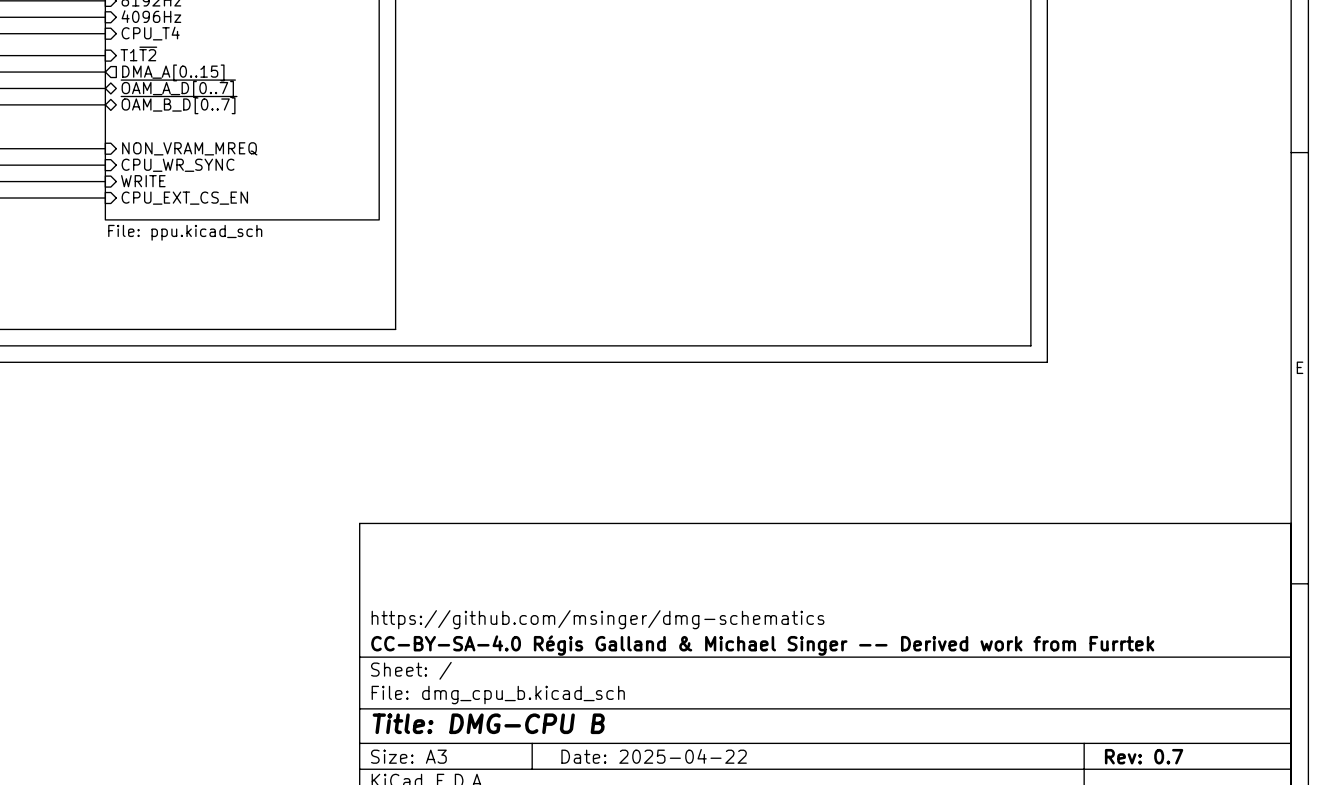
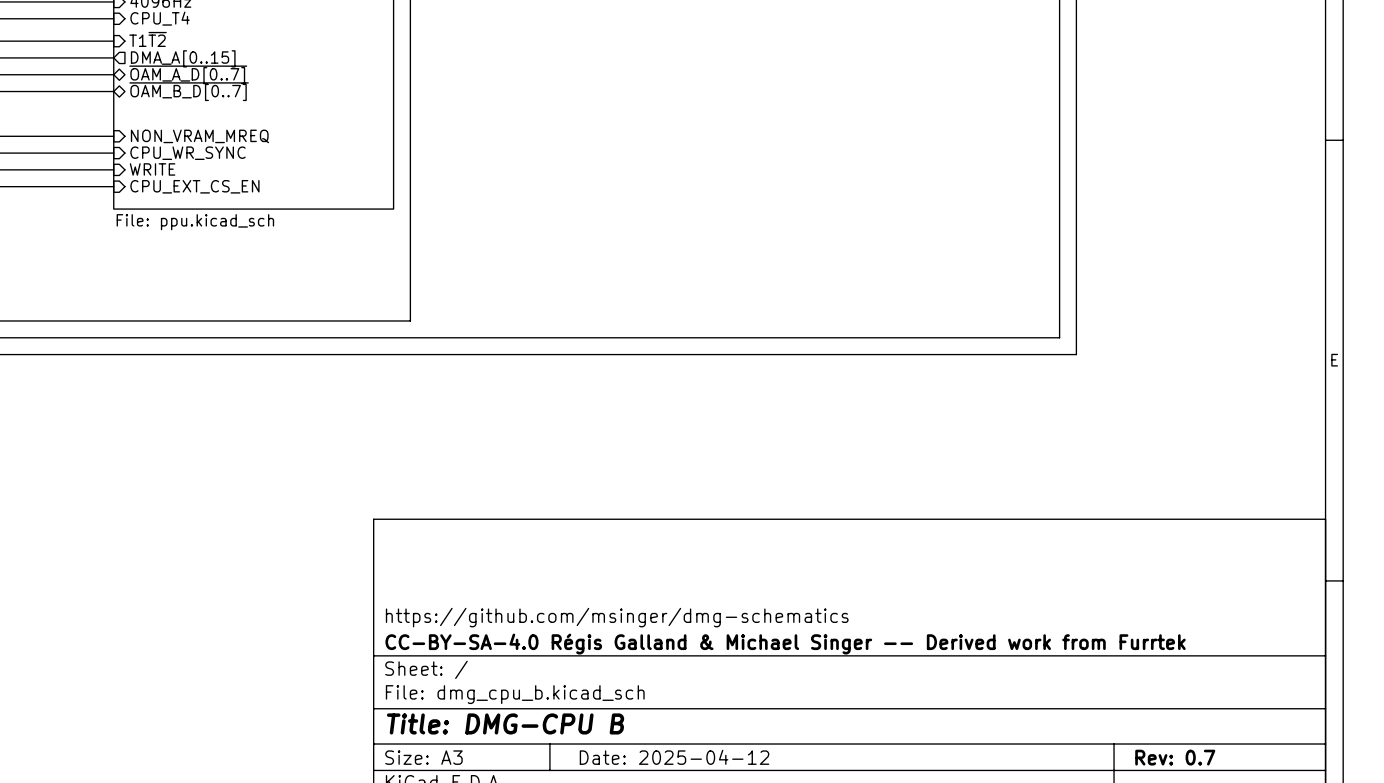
title block: Date: 2025-04-22 (654, 756) -> Date: 2025-04-12 (674, 757)

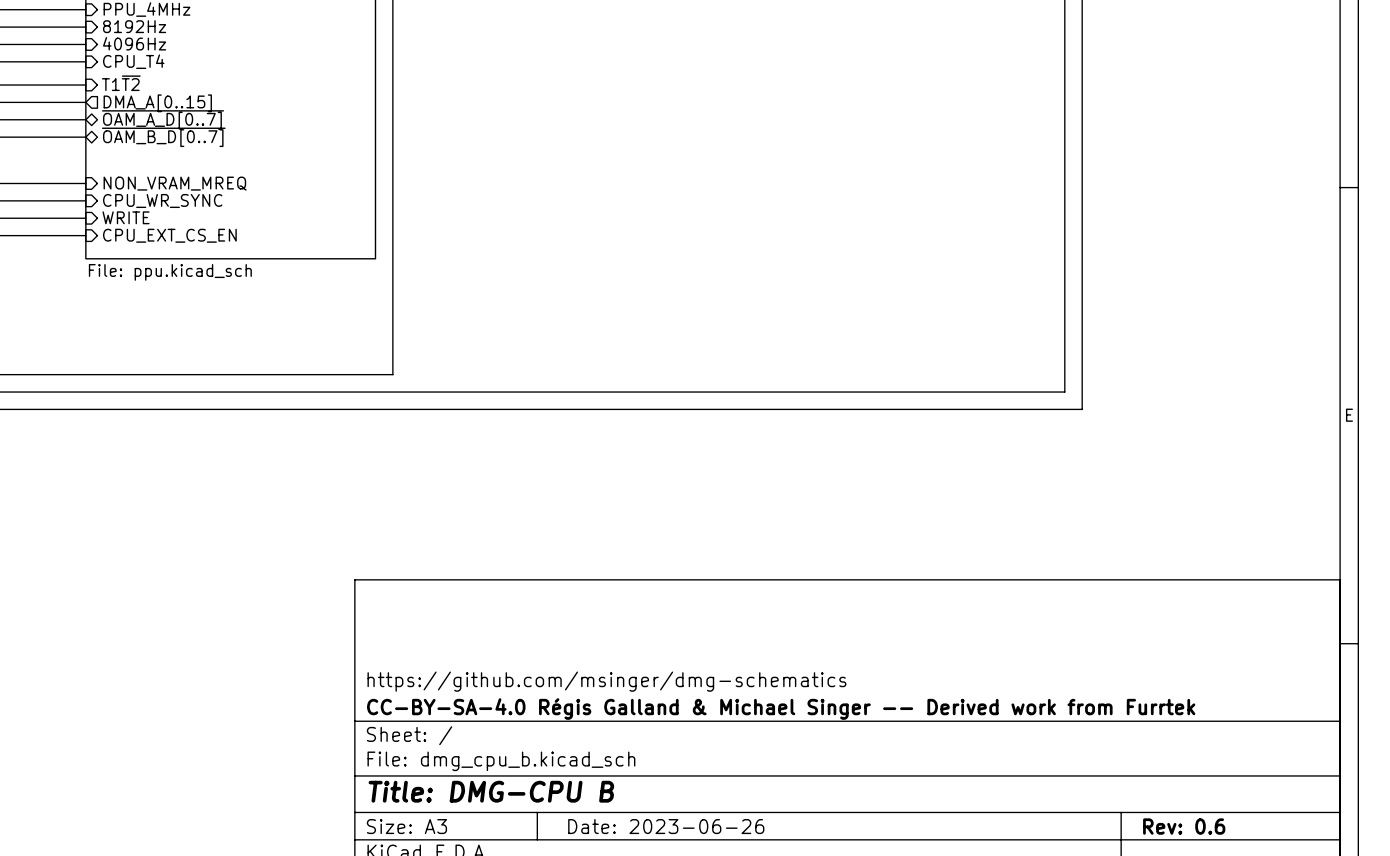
title block: Date: 2025-04-12 (674, 757) -> Date: 2023-06-26 (666, 826)
title block: Rev: 0.7 (1175, 757) -> Rev: 0.6 (1184, 826)

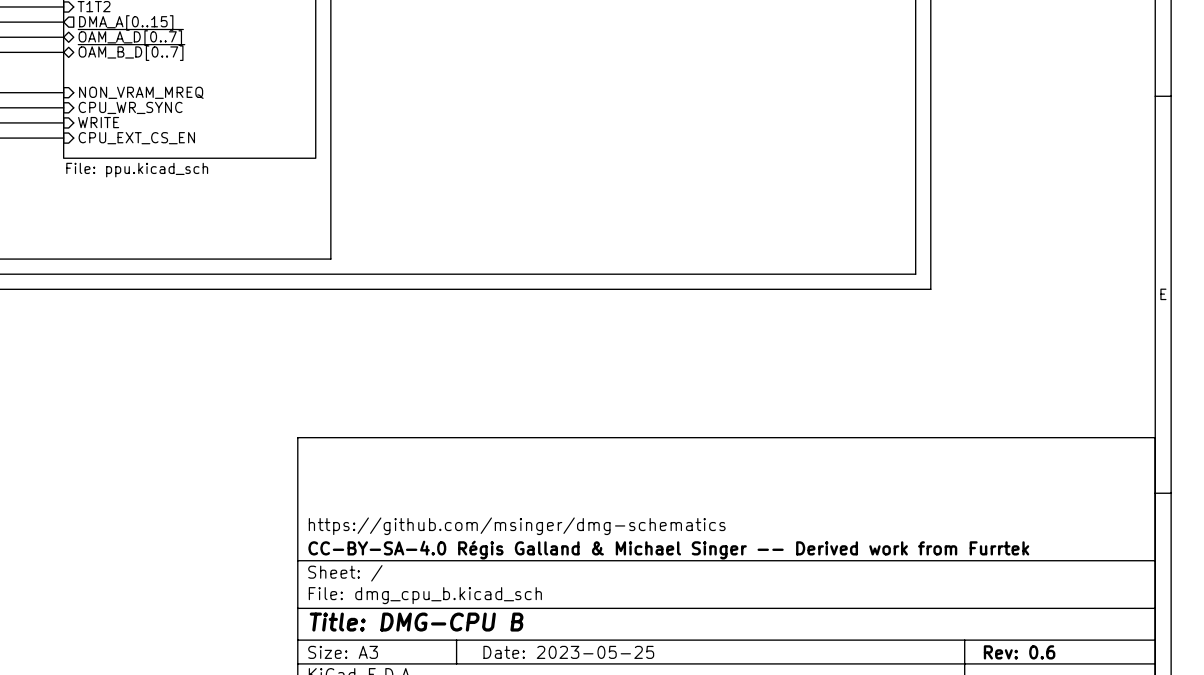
title block: Date: 2023-06-26 (666, 826) -> Date: 2023-05-25 (568, 652)

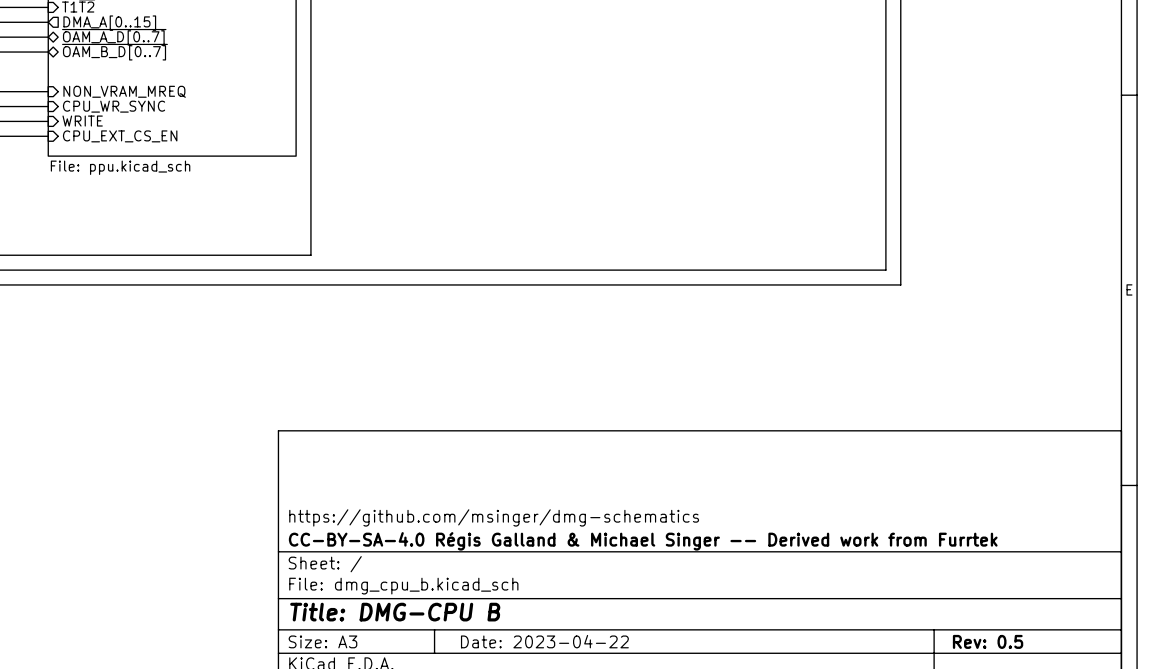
title block: Date: 2023-05-25 (568, 652) -> Date: 2023-04-22 (544, 641)
title block: Rev: 0.6 (1019, 652) -> Rev: 0.5 (988, 641)

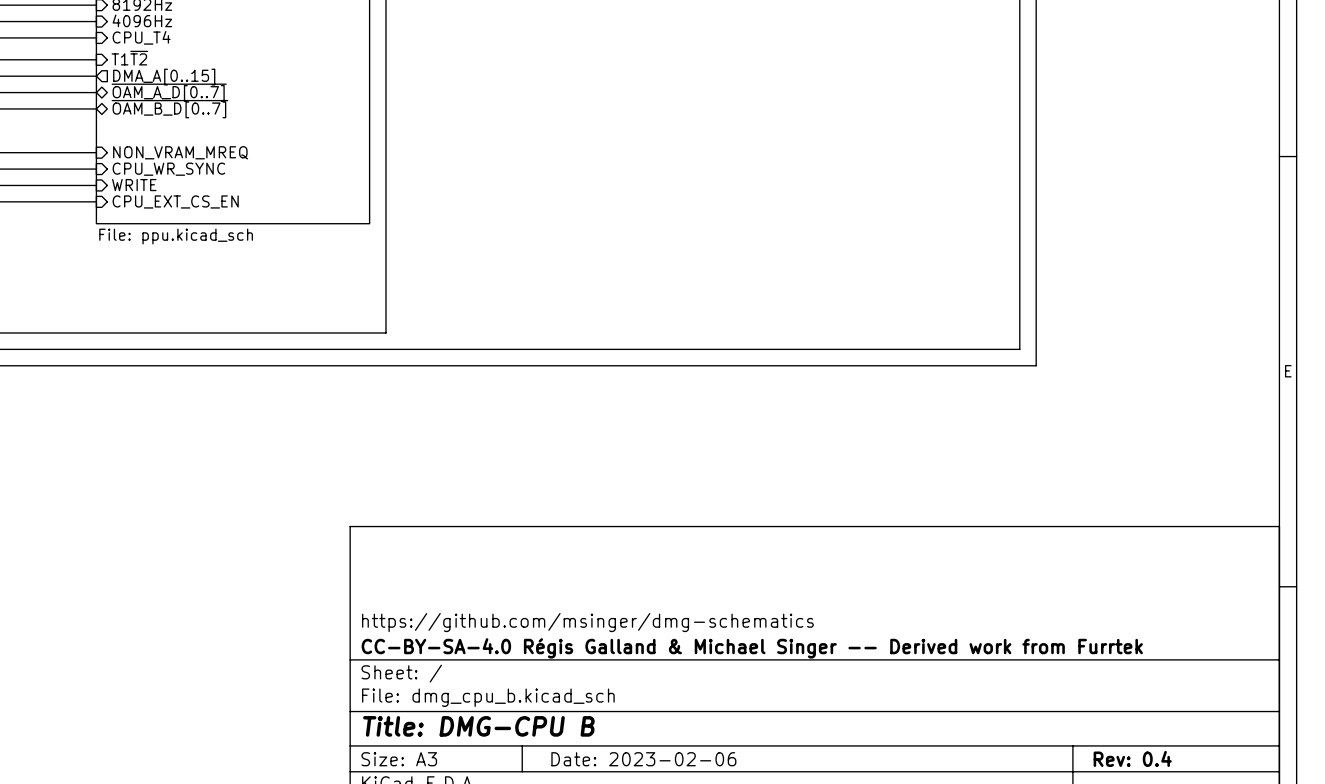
title block: Date: 2023-04-22 (544, 641) -> Date: 2023-02-06 (643, 759)
title block: Rev: 0.5 (988, 641) -> Rev: 0.4 (1132, 758)

